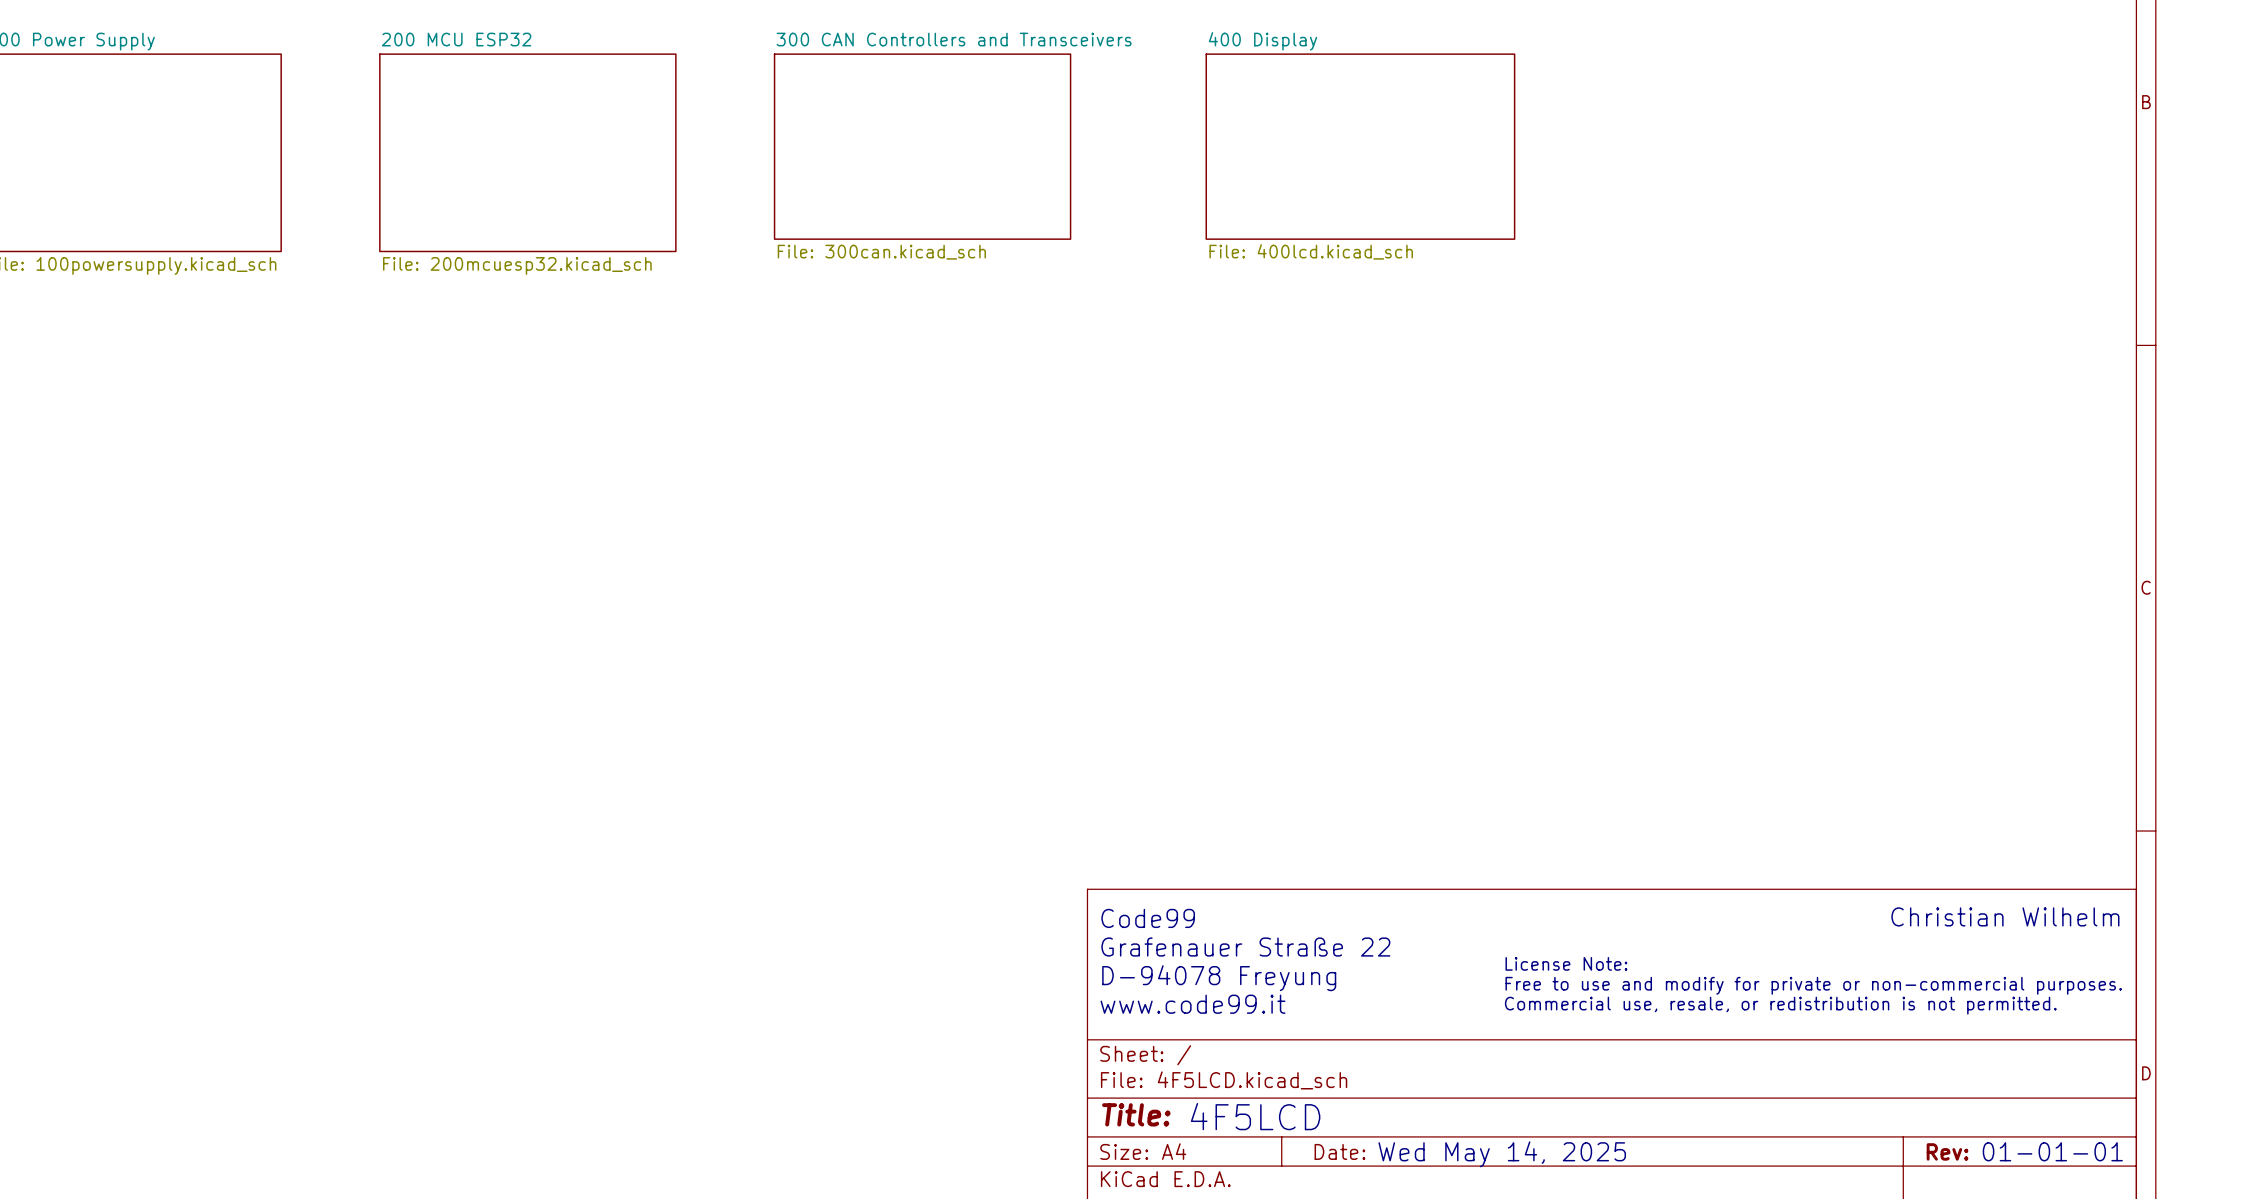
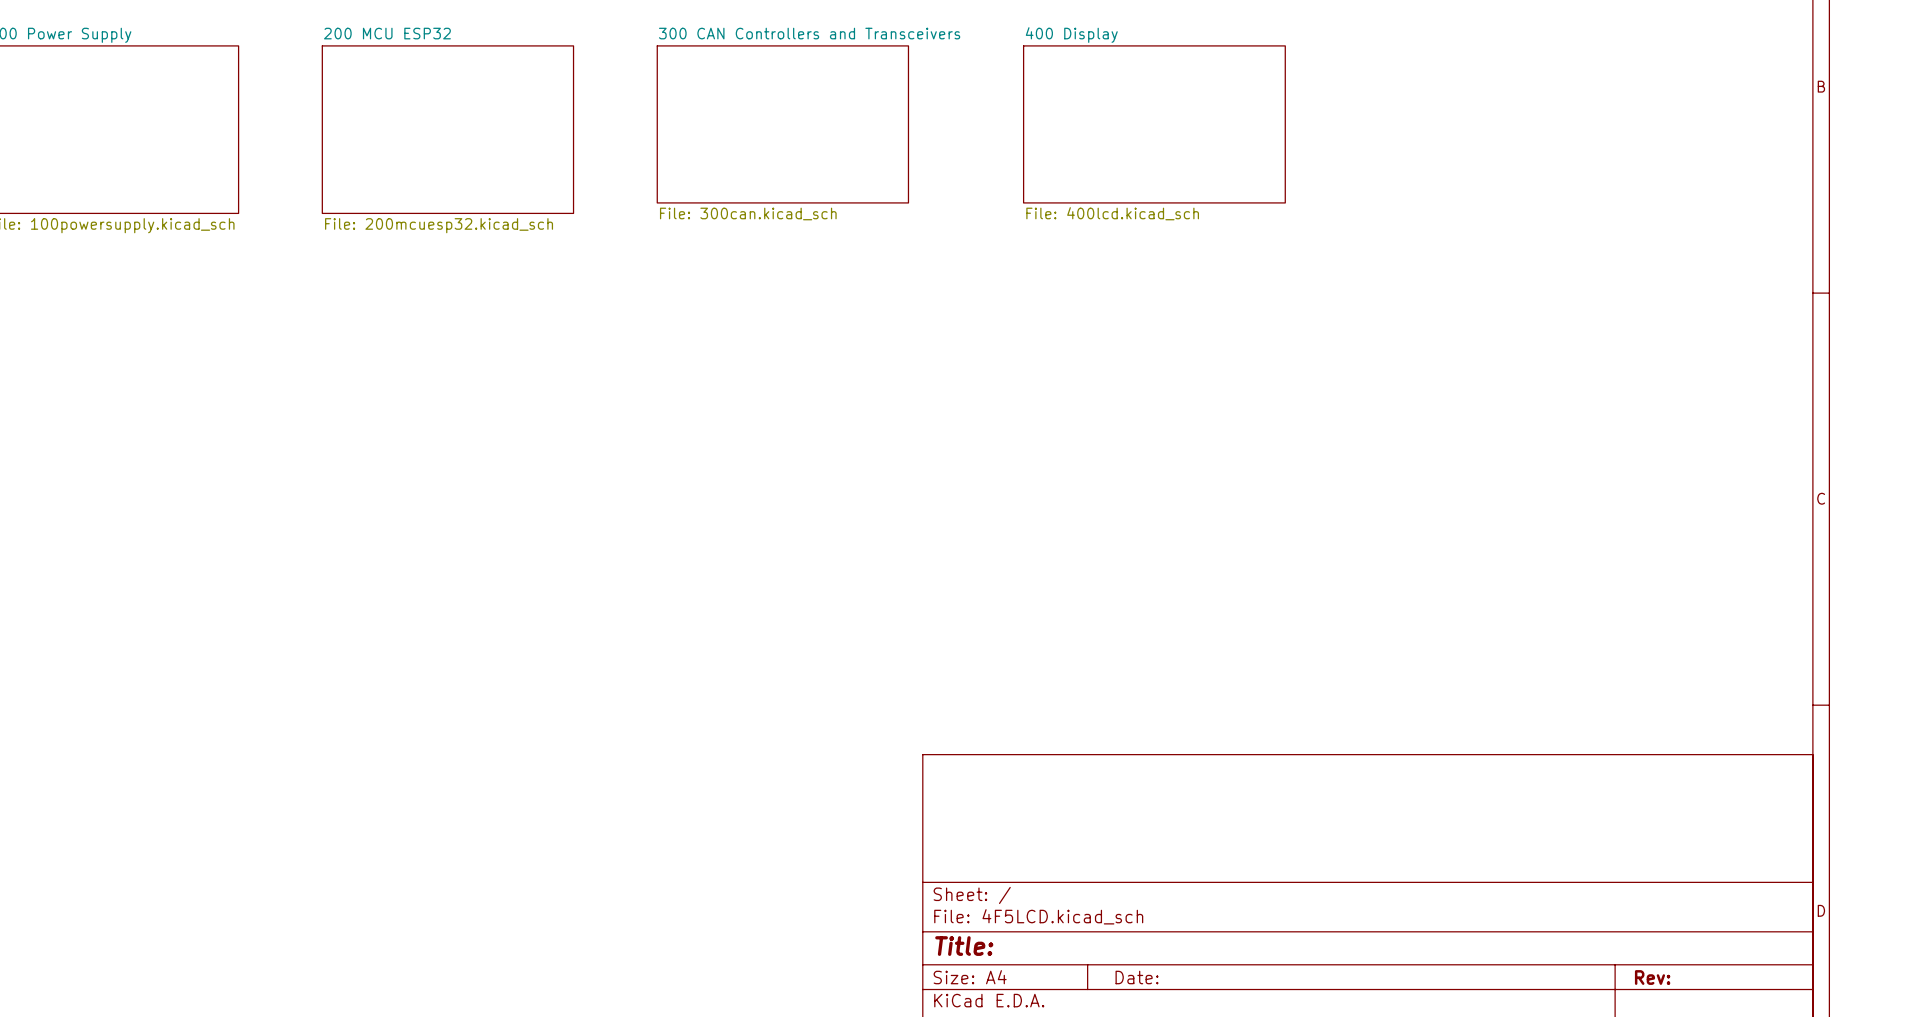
text: Christian Wilhelm (2005, 916) -> none
text: Code99 (1148, 918) -> none
text: Grafenauer Straße 22 (1245, 947) -> none
text: License Note: (1566, 963) -> none
text: D-94078 Freyung (1219, 978) -> none
text: Free to use and modify for private or non-commercial purposes. (1813, 985) -> none
text: www.code99.it (1192, 1004) -> none
text: Commercial use, resale, or redistribution is not permitted. (1780, 1005) -> none
text: 4F5LCD (1255, 1116) -> none
text: 01-01-01 (2052, 1151) -> none
text: Wed May 14, 2025 (1502, 1154) -> none

